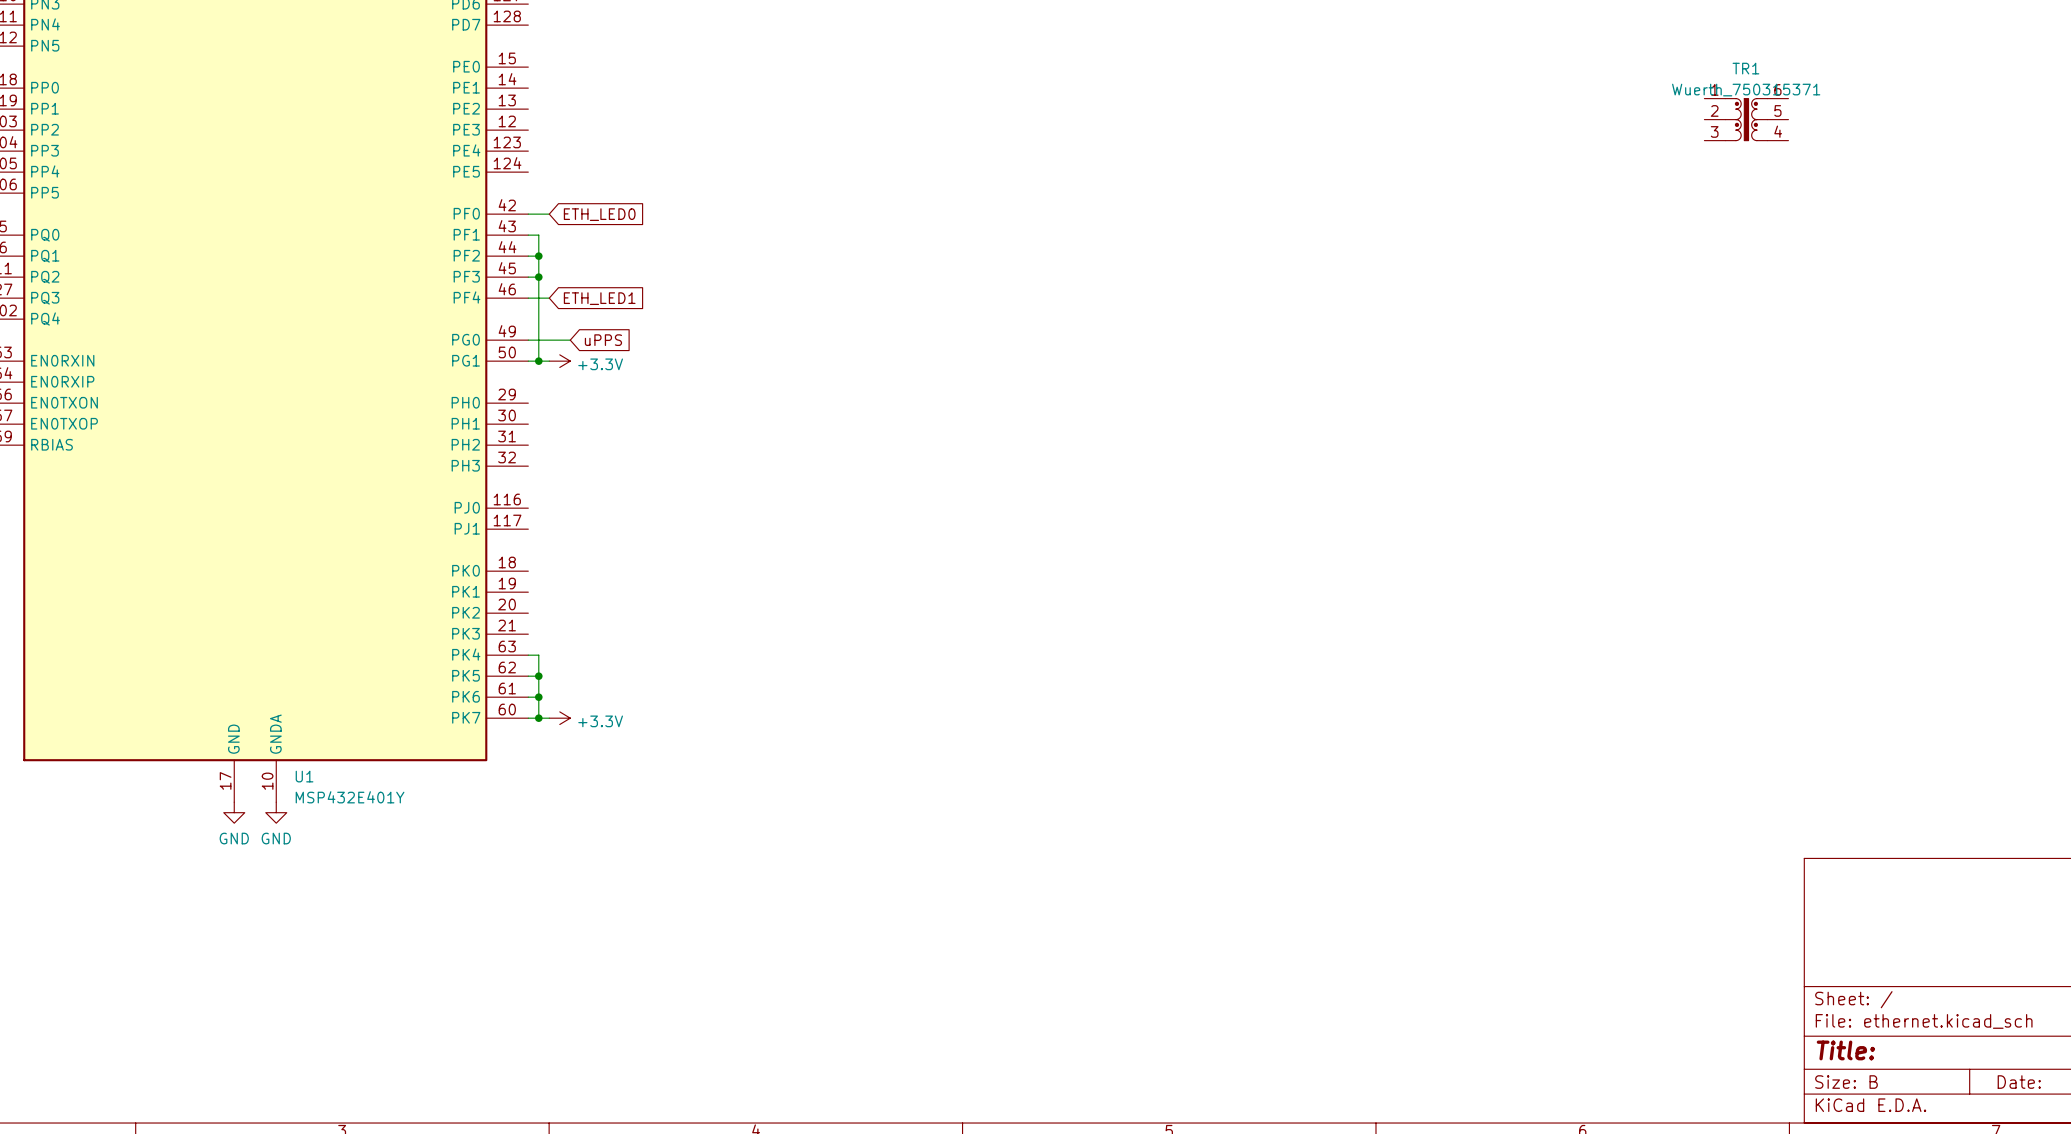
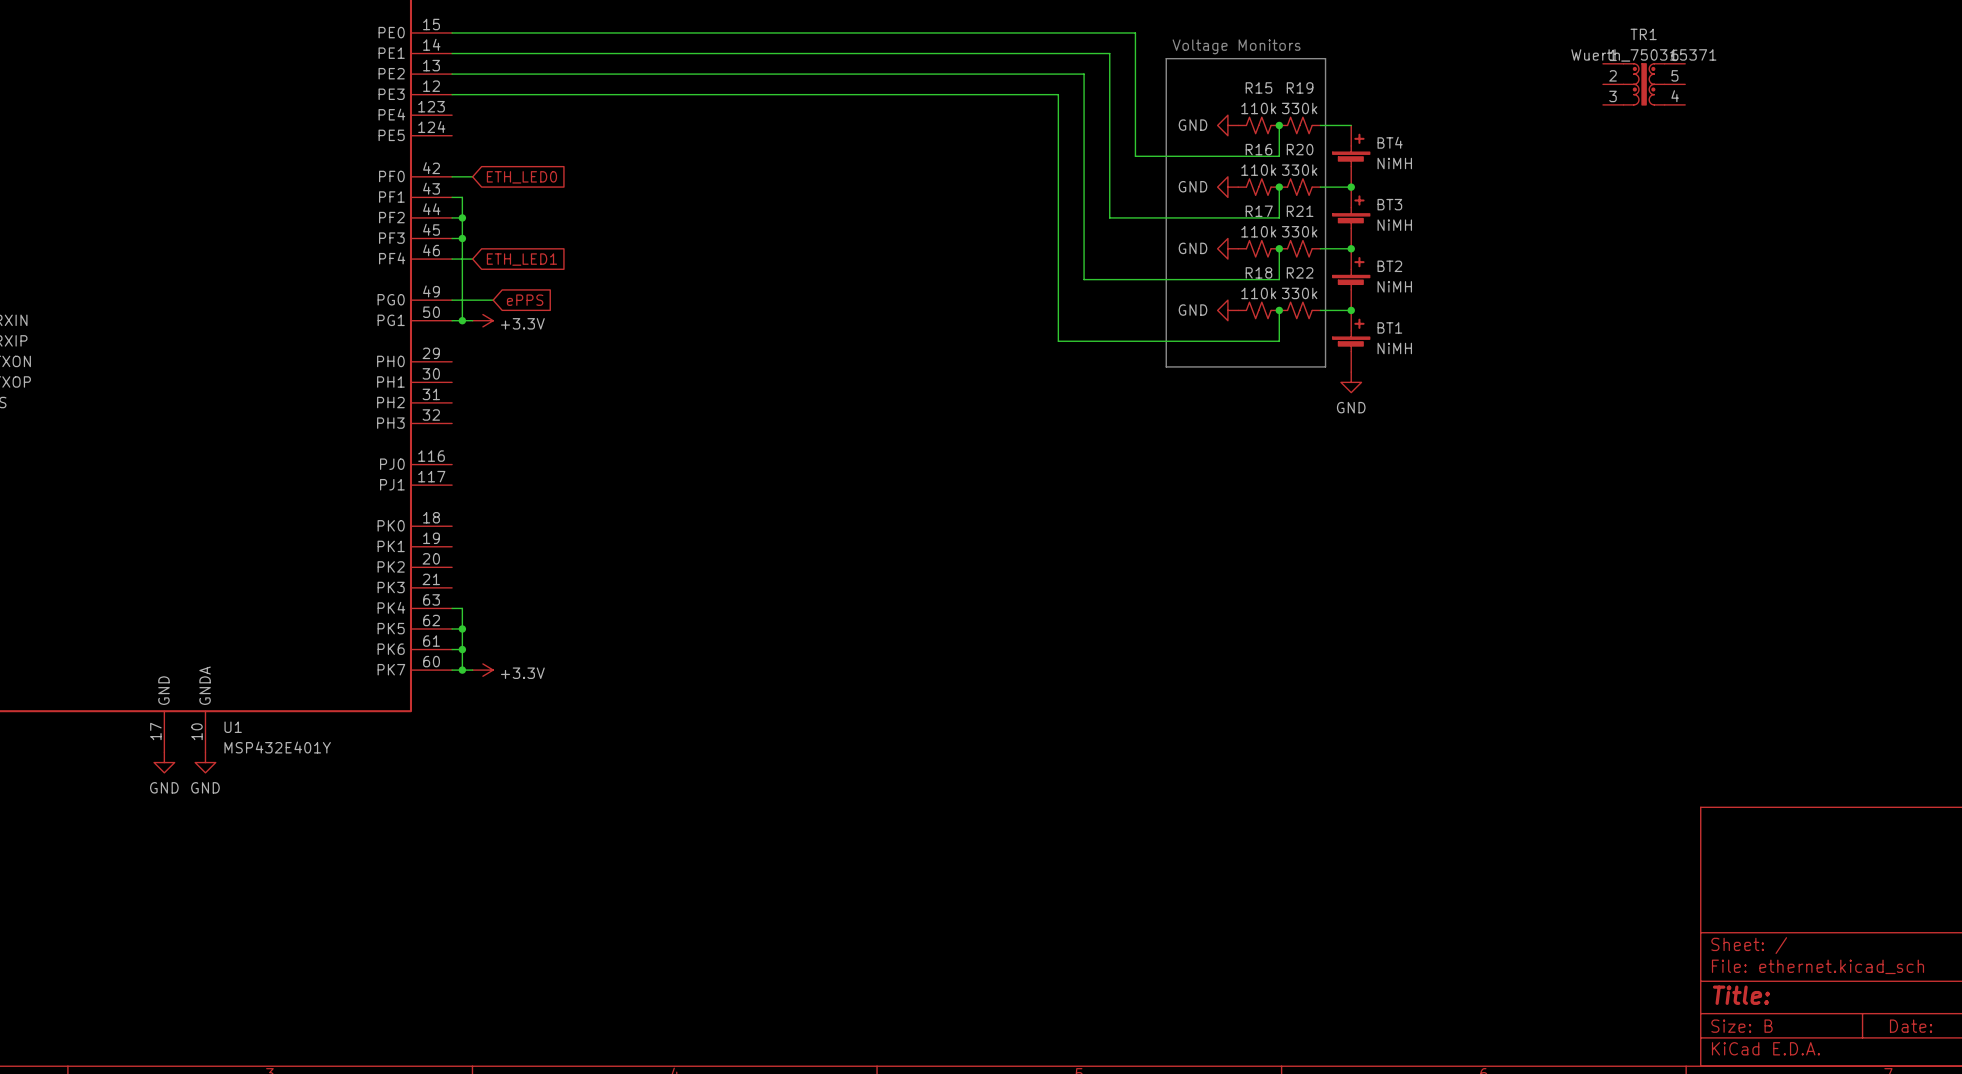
wire: none -> (452, 32) (1135, 32) (1135, 156) (1279, 156) (1279, 125)
text: none -> Voltage Monitors (1236, 46)
wire: none -> (452, 53) (1109, 53) (1109, 217) (1279, 217) (1279, 187)
line: none -> (1166, 58) (1166, 366) (1325, 366) (1325, 58) (1166, 58)
wire: none -> (452, 74) (1084, 74) (1084, 279) (1279, 279) (1279, 248)
wire: none -> (452, 94) (1058, 94) (1058, 341) (1279, 341) (1279, 310)
power symbol: none -> GND (1227, 125)
R15: none -> 110k (1258, 125)
junction: none -> (1279, 125)
R19: none -> 330k (1299, 125)
wire: none -> (1320, 125) (1351, 125)
BT4: none -> NiMH (1351, 156)
power symbol: none -> GND (1227, 187)
R16: none -> 110k (1258, 187)
junction: none -> (1279, 187)
R20: none -> 330k (1299, 187)
wire: none -> (1320, 187) (1351, 187)
junction: none -> (1351, 187)
BT3: none -> NiMH (1351, 217)
power symbol: none -> GND (1227, 248)
R17: none -> 110k (1258, 248)
junction: none -> (1279, 248)
R21: none -> 330k (1299, 248)
wire: none -> (1320, 248) (1351, 248)
junction: none -> (1351, 248)
BT2: none -> NiMH (1351, 279)
global label: uPPS (603, 340) -> ePPS (525, 300)
power symbol: none -> GND (1227, 310)
R18: none -> 110k (1258, 310)
junction: none -> (1279, 310)
R22: none -> 330k (1299, 310)
wire: none -> (1320, 310) (1351, 310)
junction: none -> (1351, 310)
BT1: none -> NiMH (1351, 341)
power symbol: none -> GND (1351, 382)

